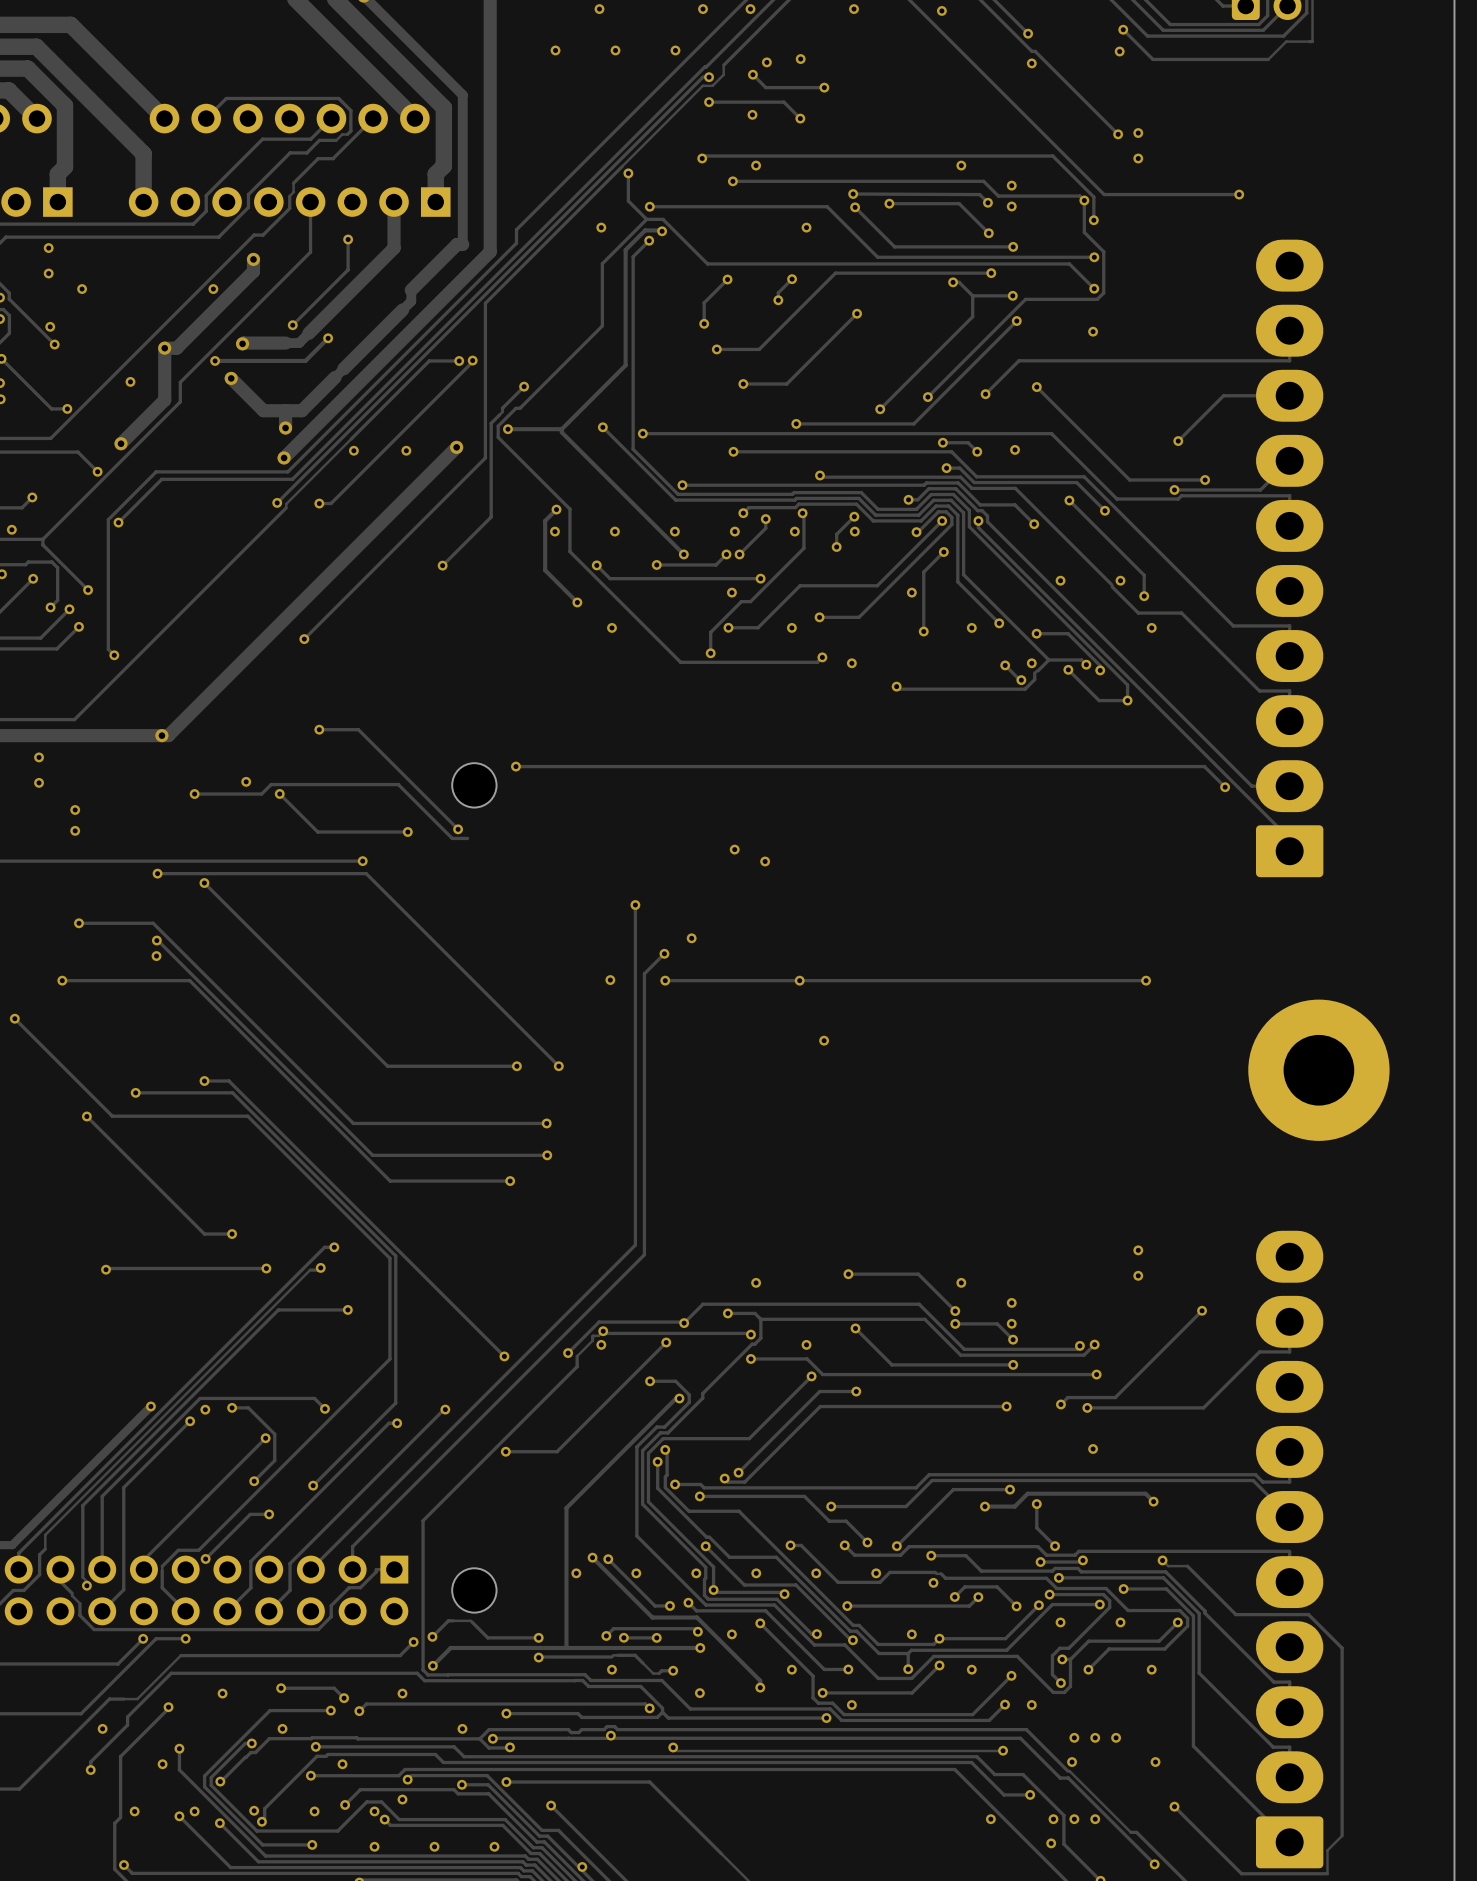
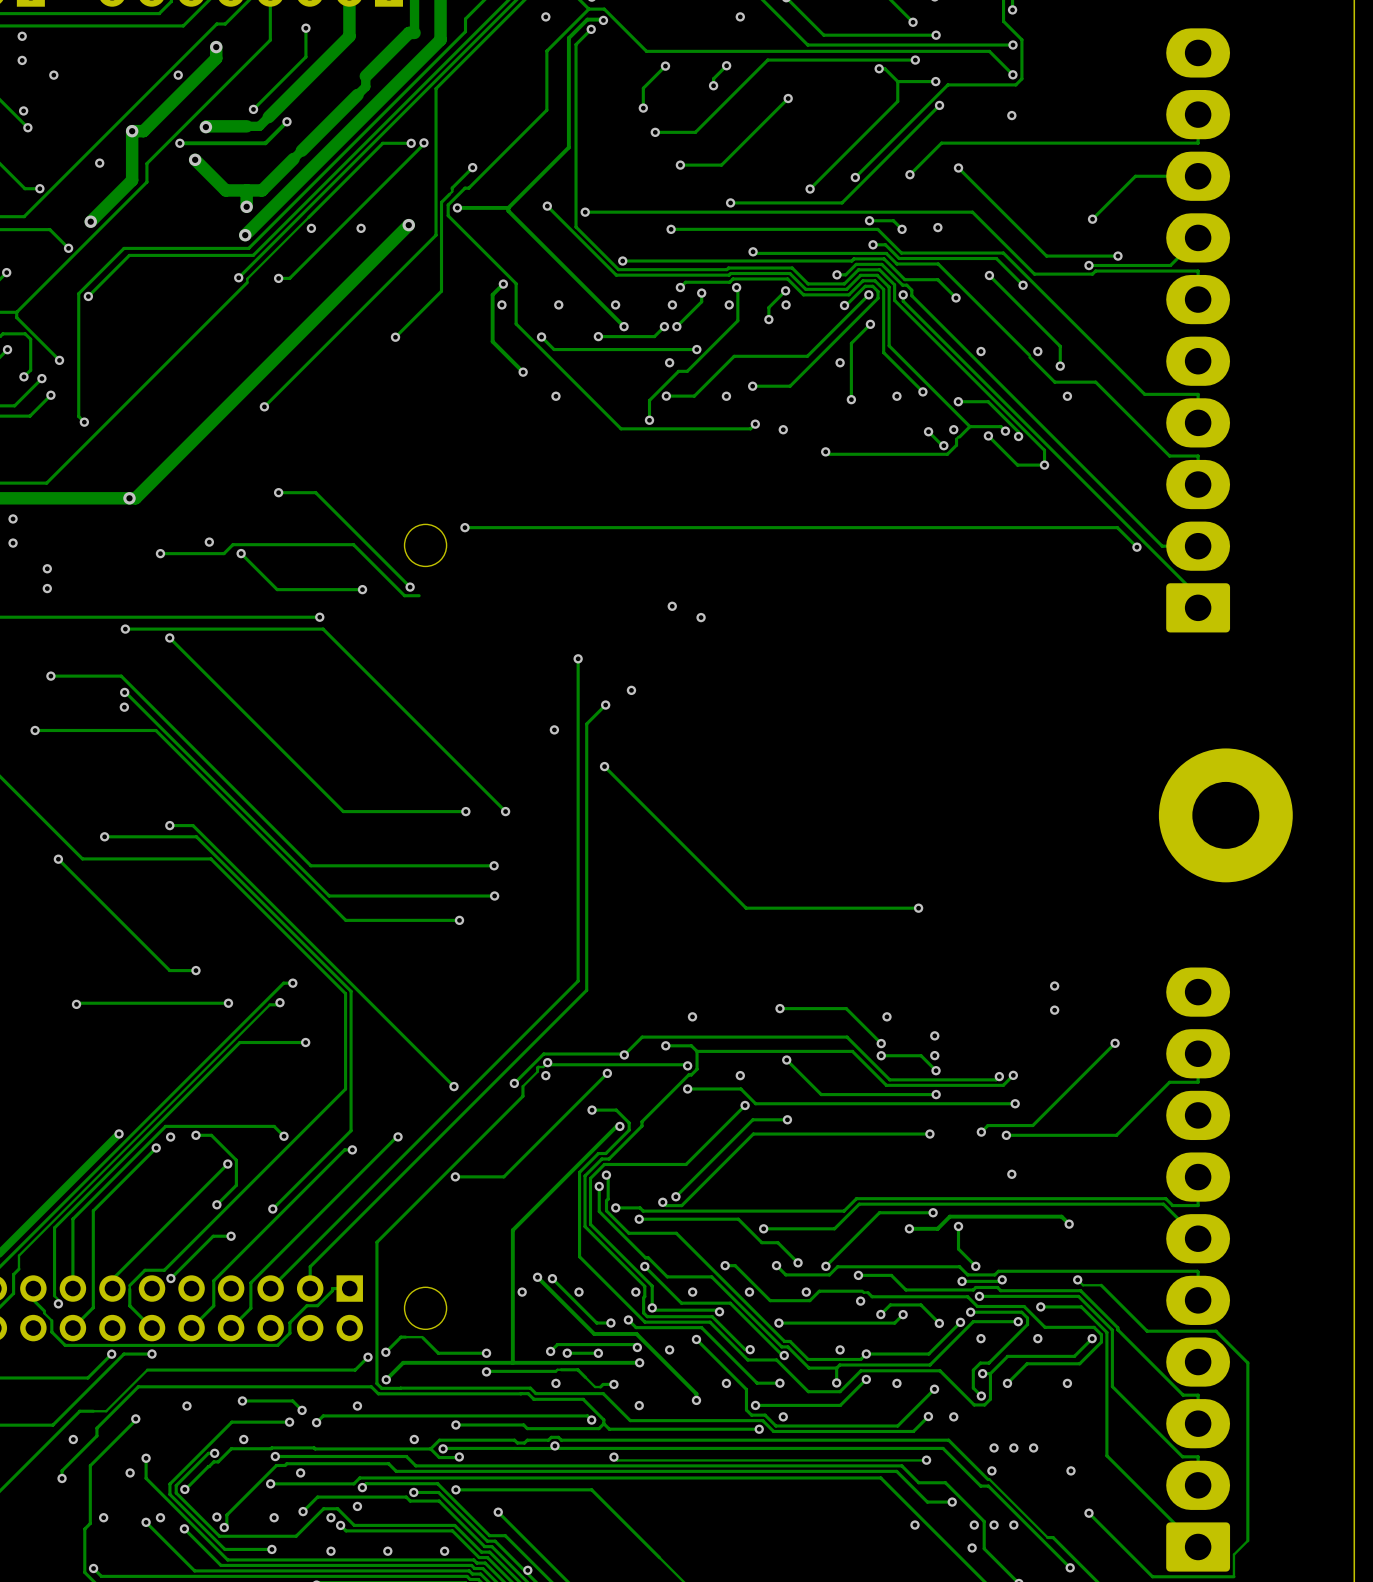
via position: (665, 980) -> (604, 766)
via: (799, 980) -> none
track: (1146, 980) (665, 980) -> none
via: (1146, 980) -> none
track: none -> (604, 766) (746, 908) (918, 908)
via: (824, 1040) -> none
via: none -> (918, 908)

